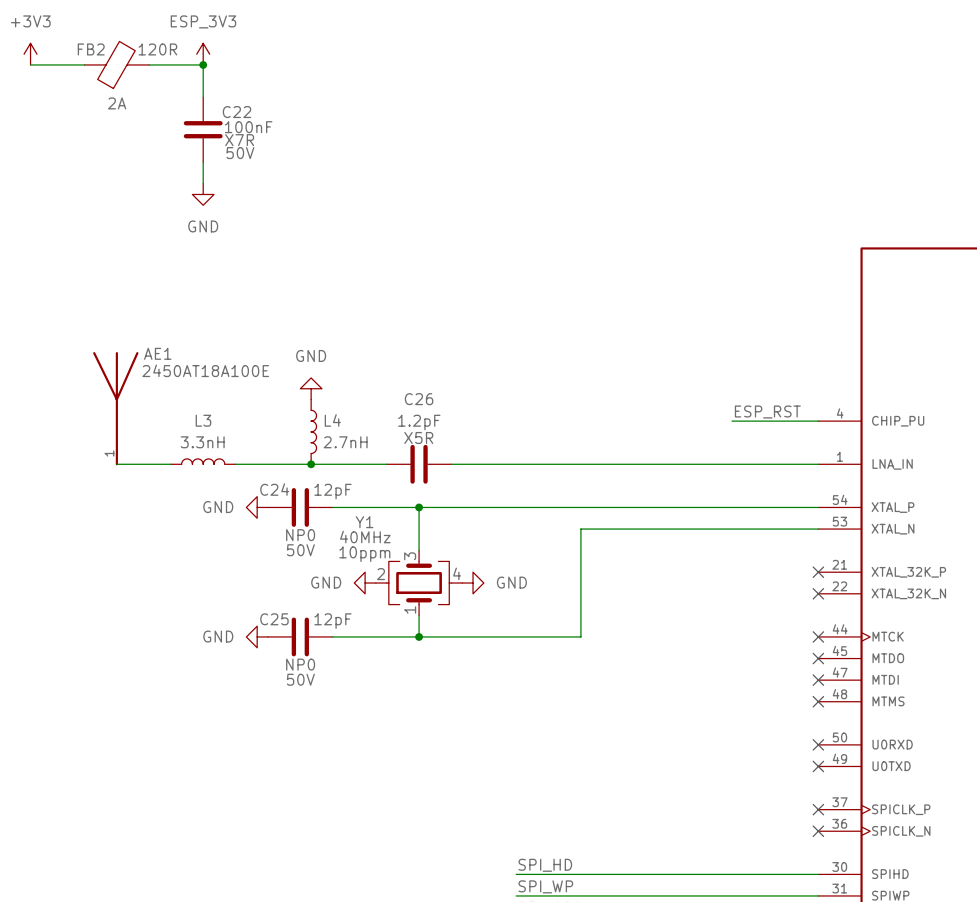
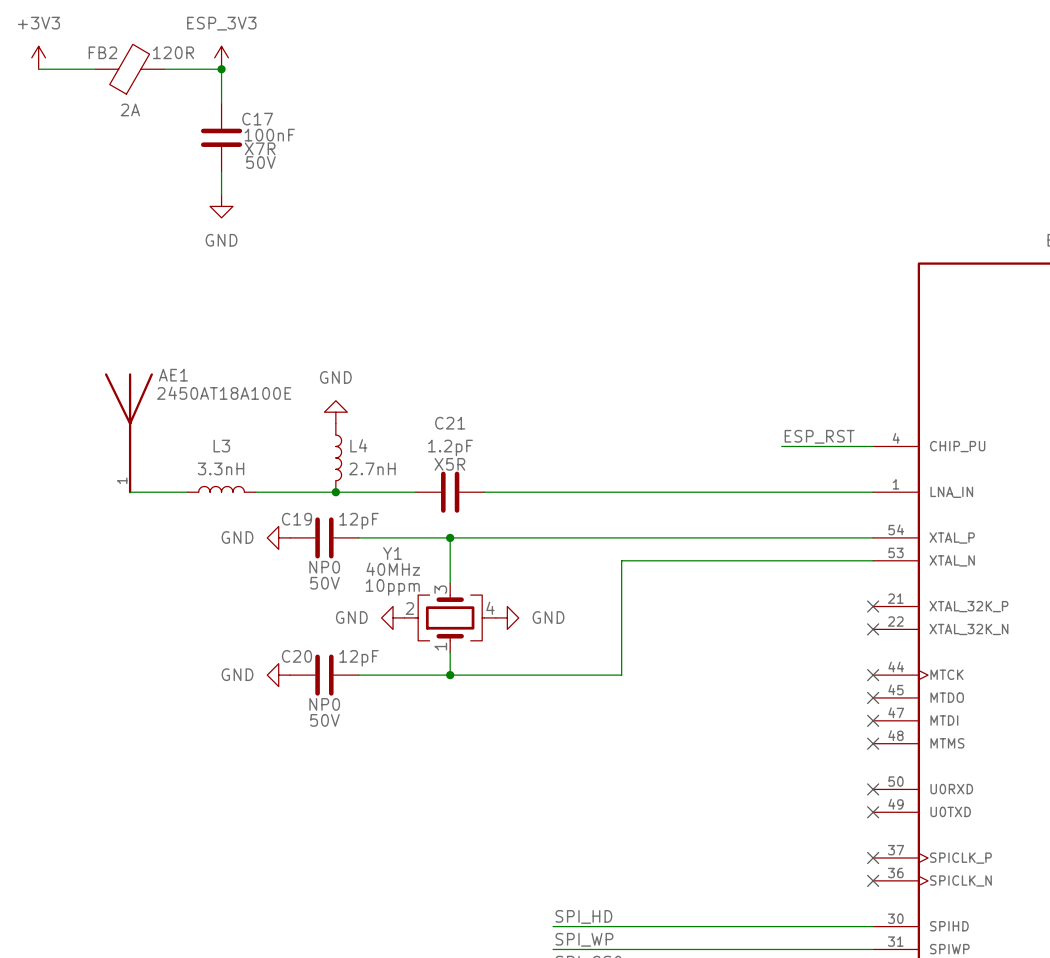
C22 name: C22 (237, 112) -> C17 (257, 119)
C26 name: C26 (419, 399) -> C21 (450, 423)
C24 name: C24 (274, 489) -> C19 (297, 519)
C25 name: C25 (274, 619) -> C20 (297, 656)

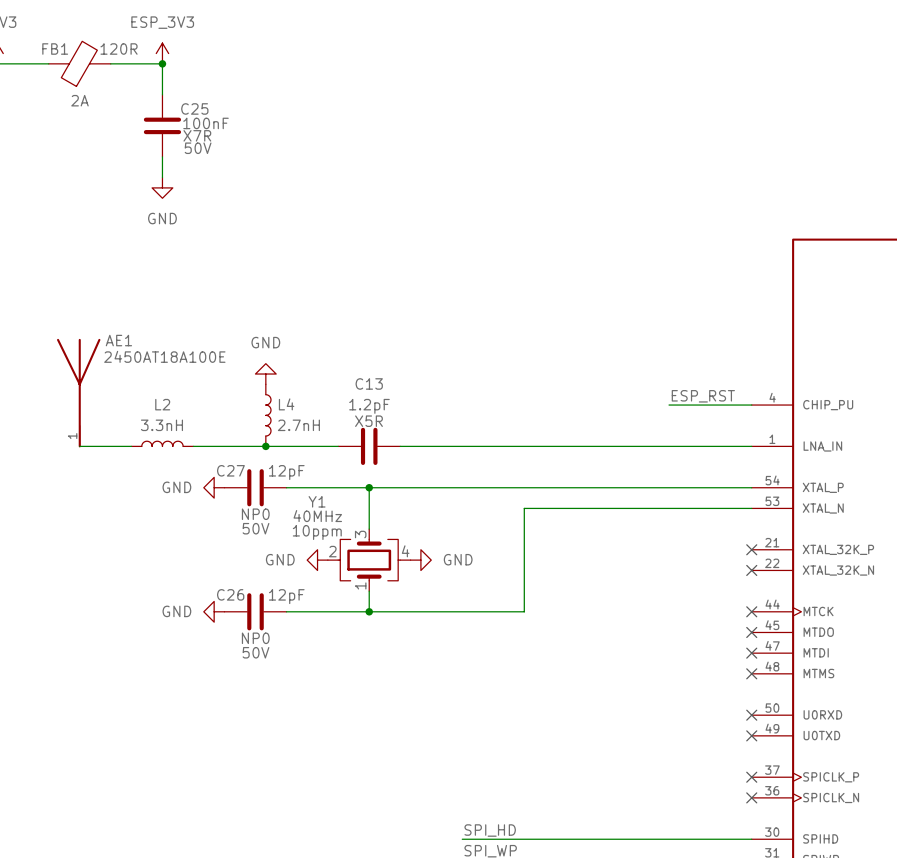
FB2 name: FB2 (102, 52) -> FB1 (55, 49)
C17 name: C17 (257, 119) -> C25 (194, 108)
C21 name: C21 (450, 423) -> C13 (369, 383)
L3 name: L3 (221, 446) -> L2 (162, 404)
C19 name: C19 (297, 519) -> C27 (230, 470)
C20 name: C20 (297, 656) -> C26 (230, 594)

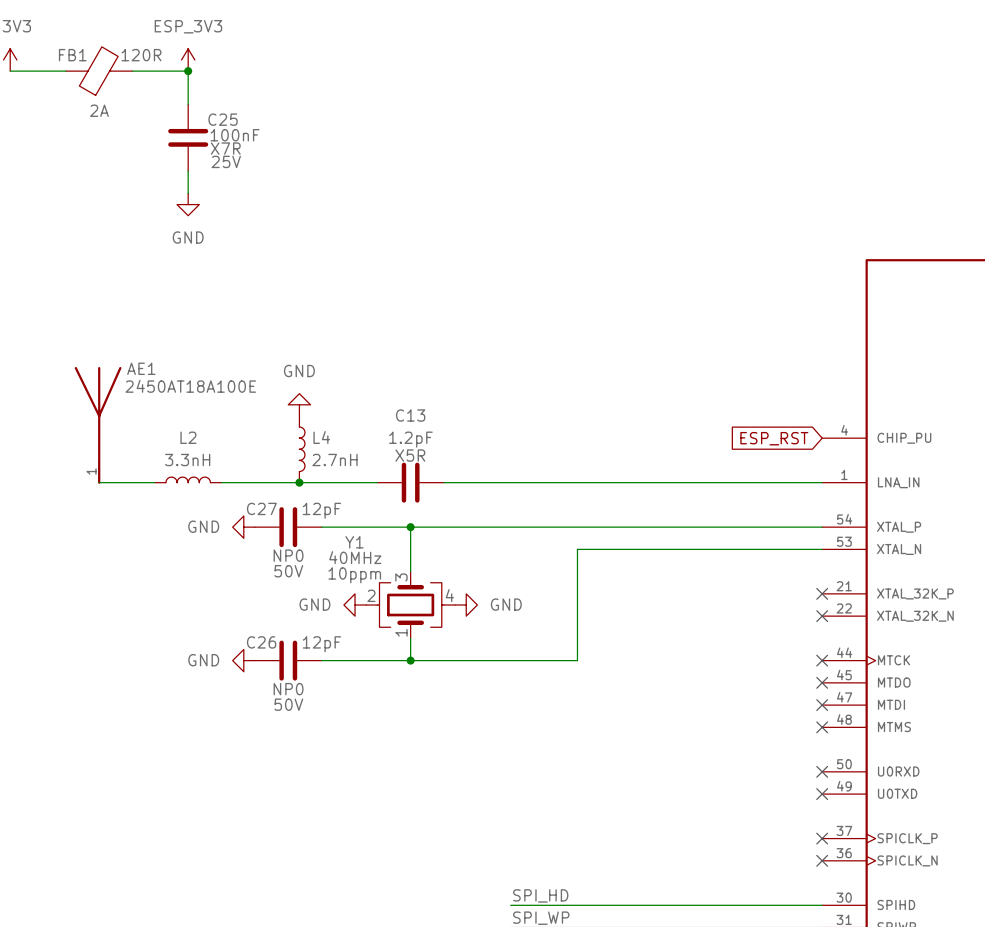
C25 text: 50V (198, 148) -> 25V (226, 161)
label: ESP_RST (703, 396) -> none
wire: (669, 405) (751, 405) -> none
global label: none -> ESP_RST (774, 438)

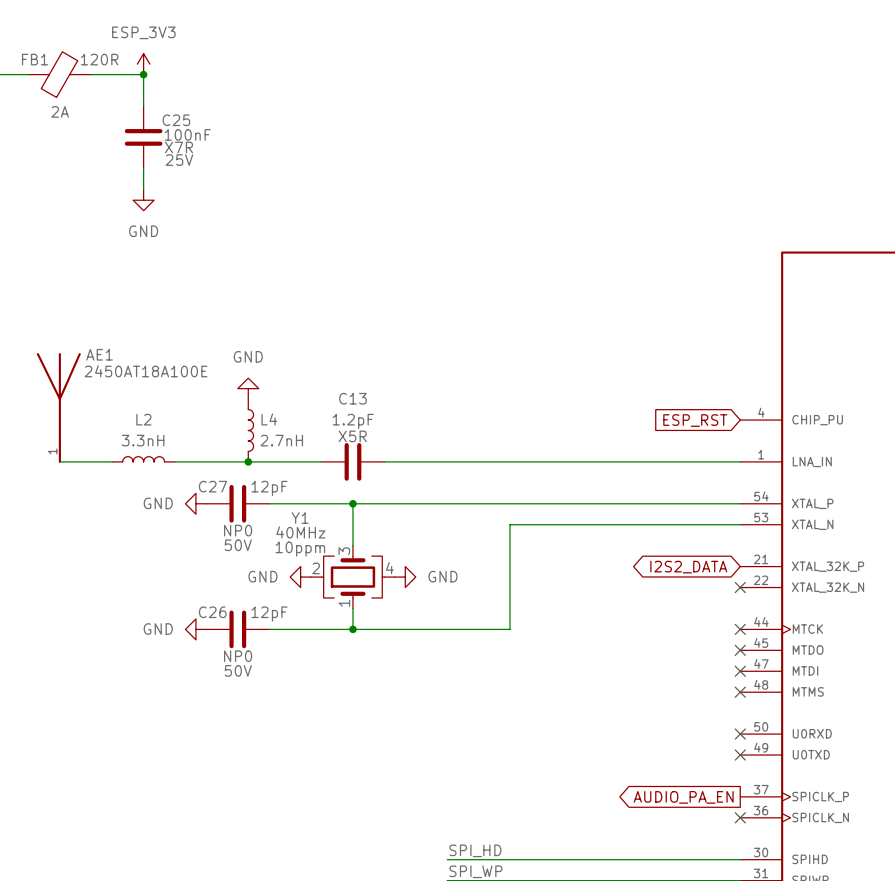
no-connect mark: (822, 593) -> none
global label: none -> I2S2_DATA (688, 567)
no-connect mark: (822, 838) -> none
global label: none -> AUDIO_PA_EN (683, 797)

